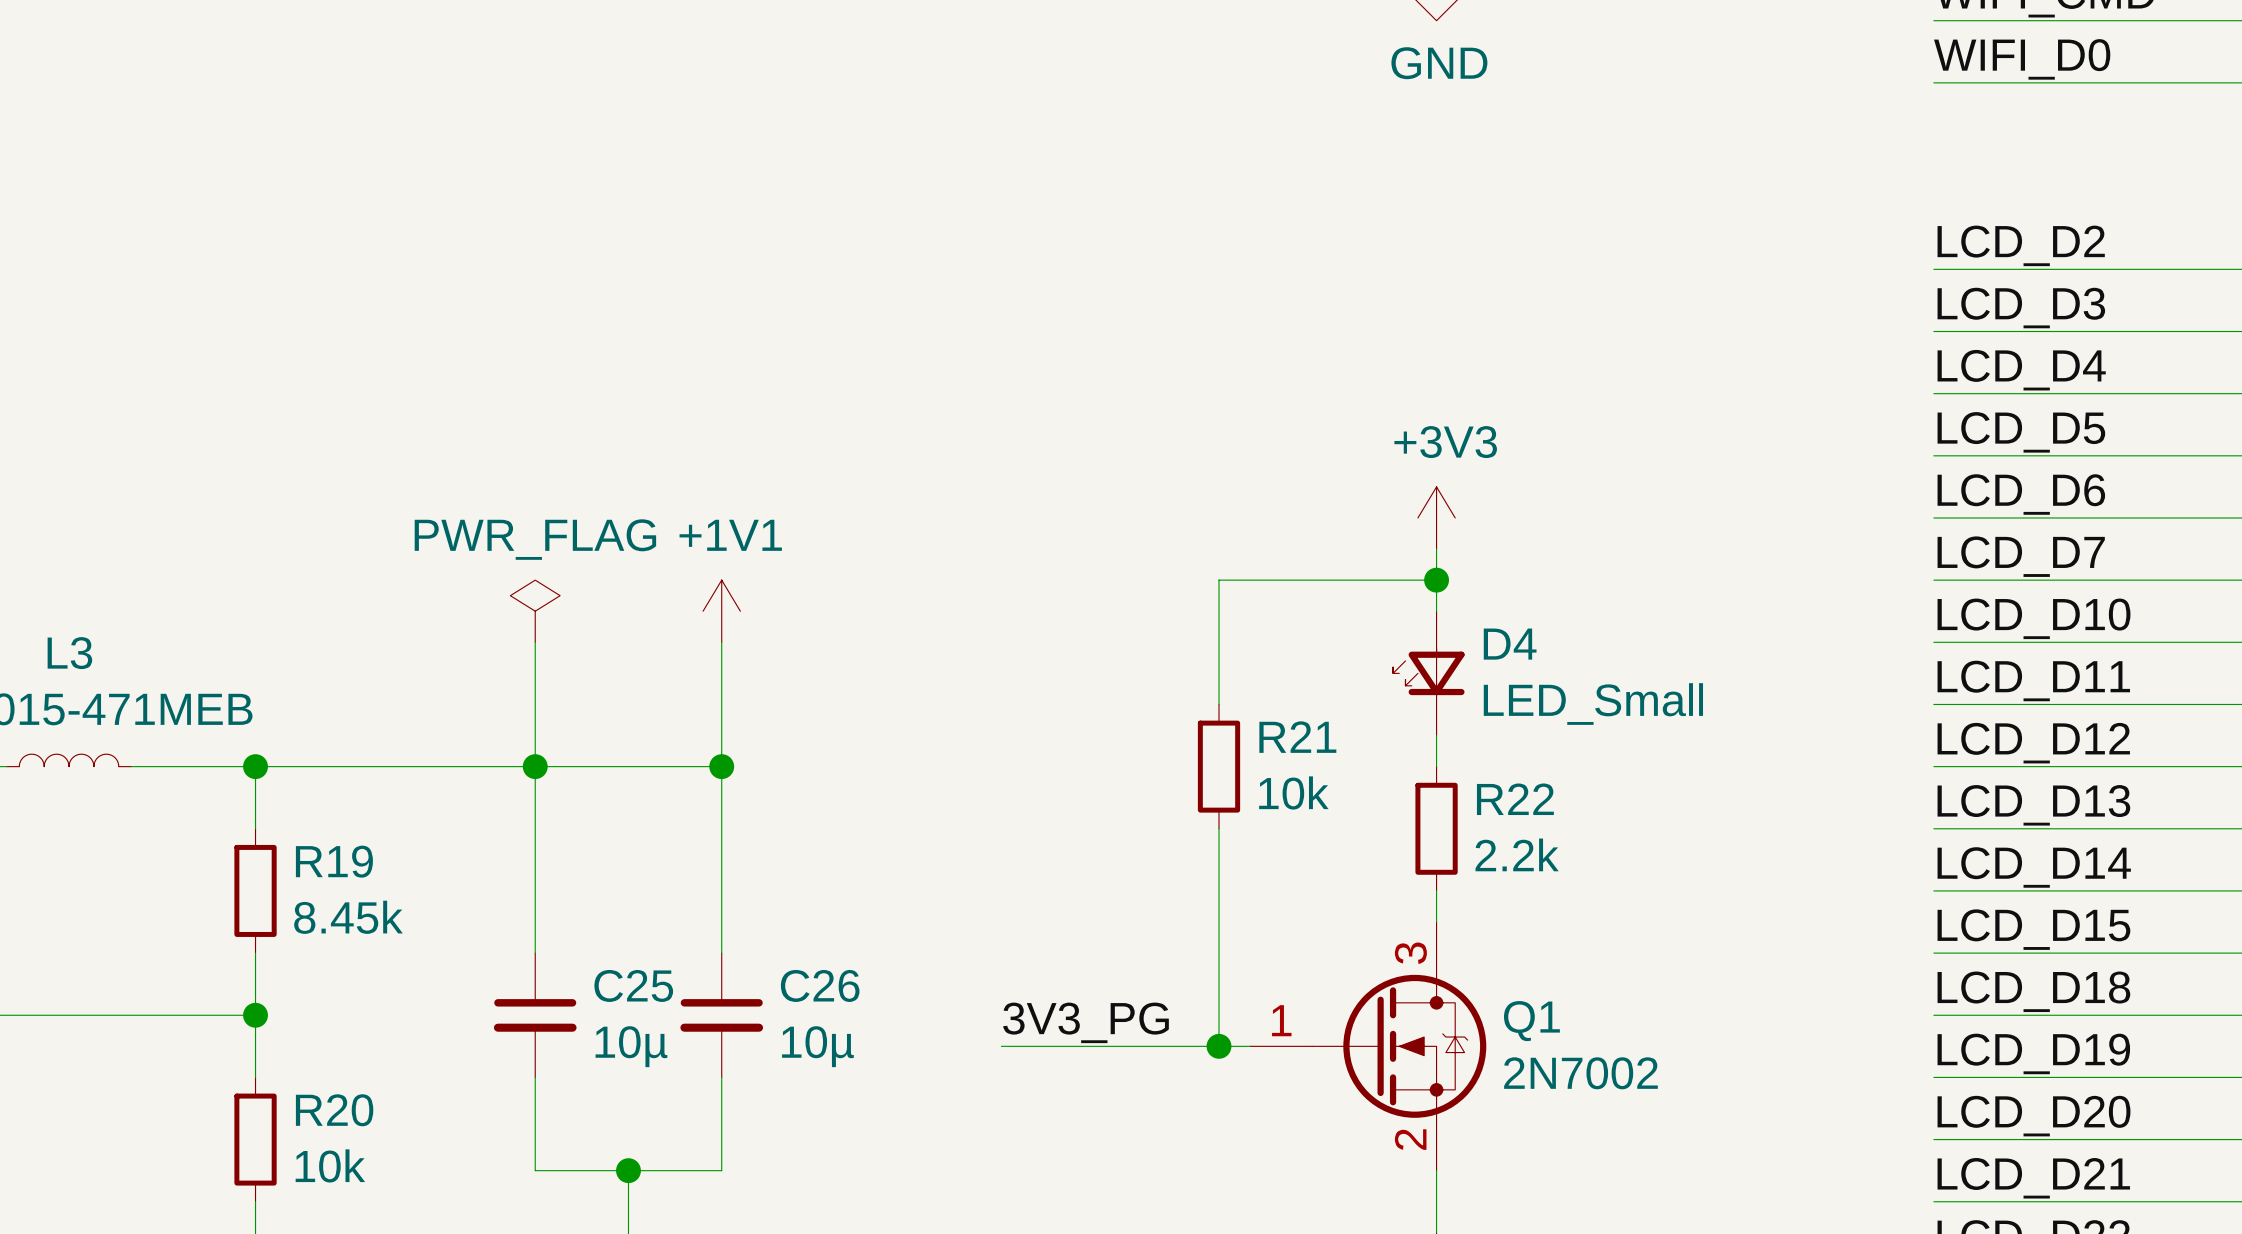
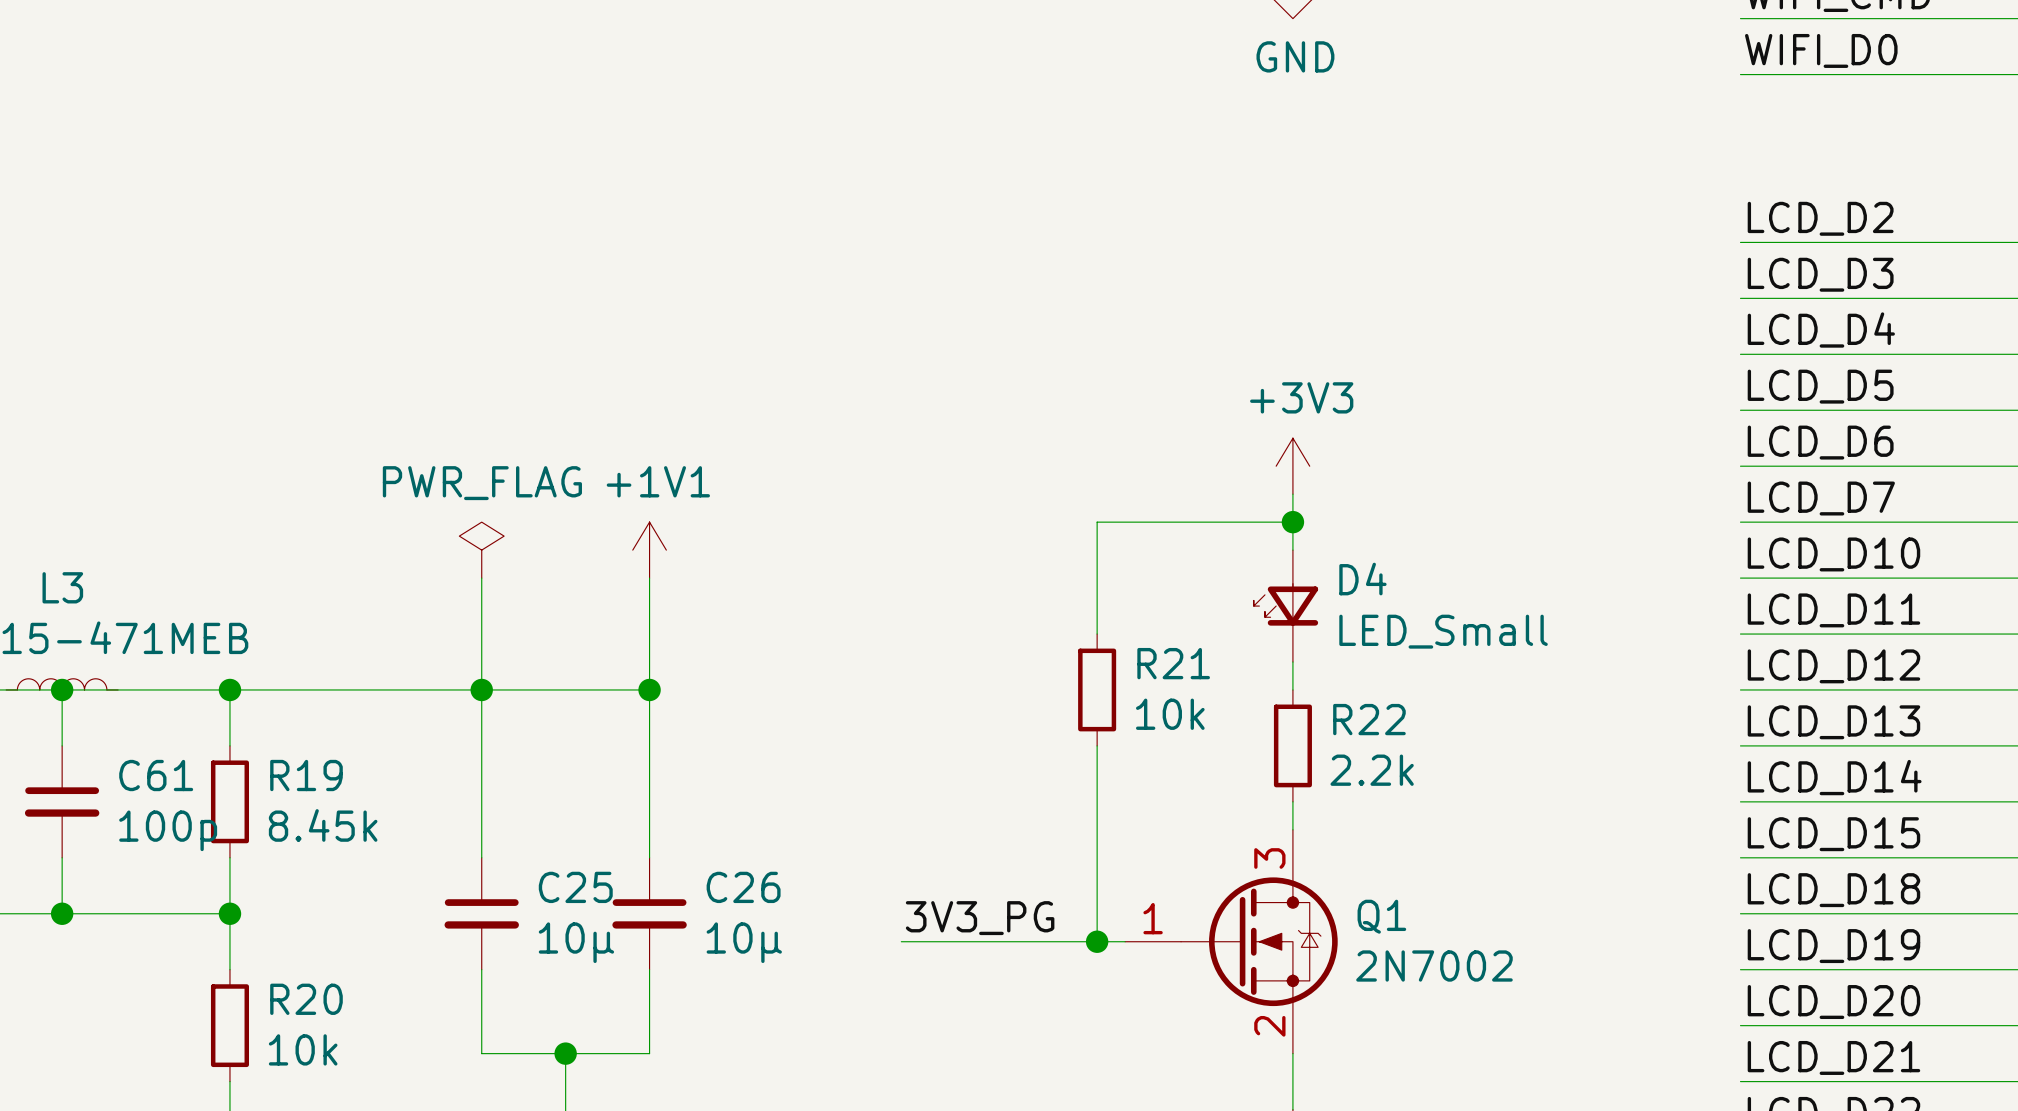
wire: none -> (6, 689) (118, 689)
wire: none -> (62, 689) (62, 745)
junction: none -> (62, 689)
C61: none -> 100p (62, 801)
wire: none -> (62, 857) (62, 913)
junction: none -> (62, 913)

